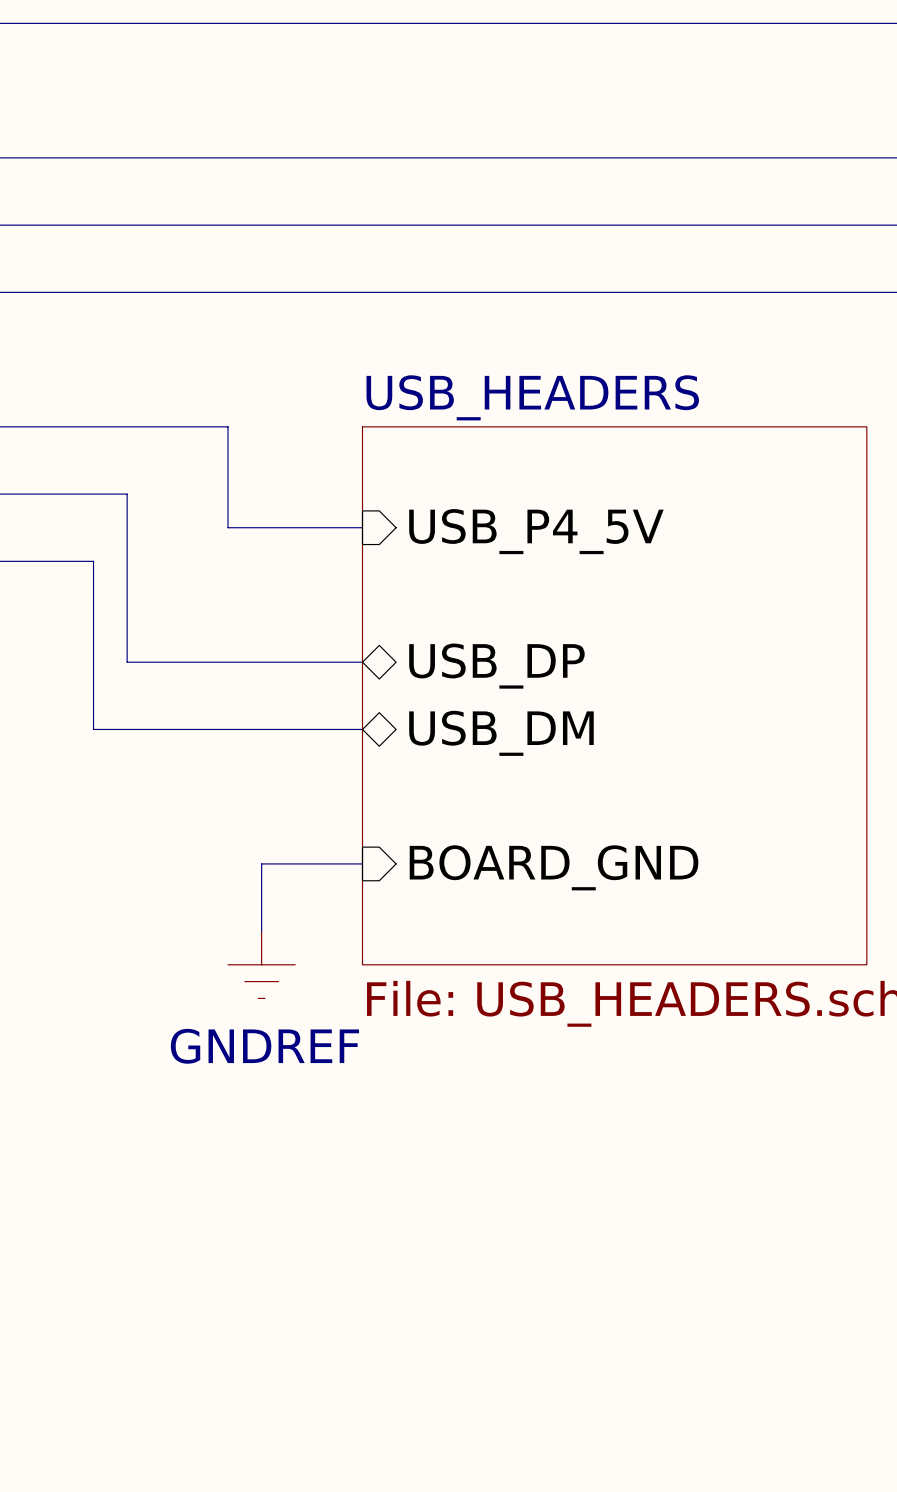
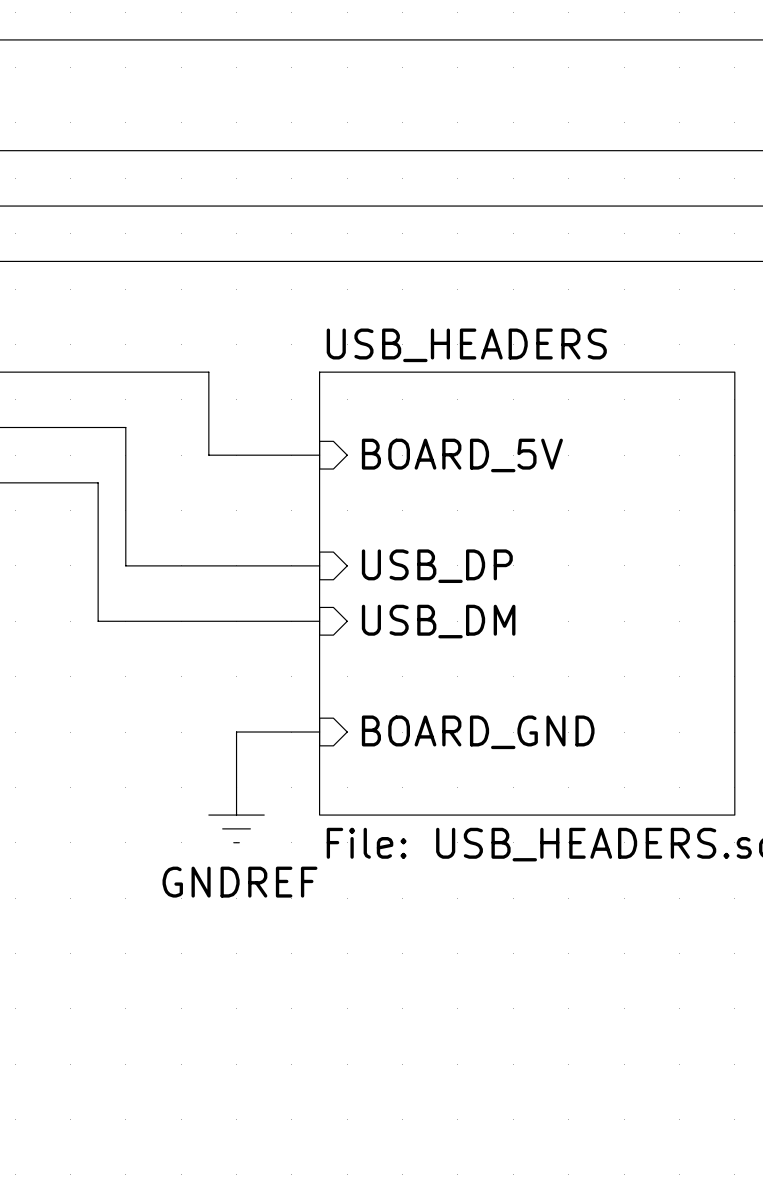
sheet pin: USB_P4_5V (536, 531) -> BOARD_5V (462, 455)
sheet pin shape: bidirectional (496, 666) -> input (437, 566)
sheet pin shape: bidirectional (501, 733) -> input (438, 621)

